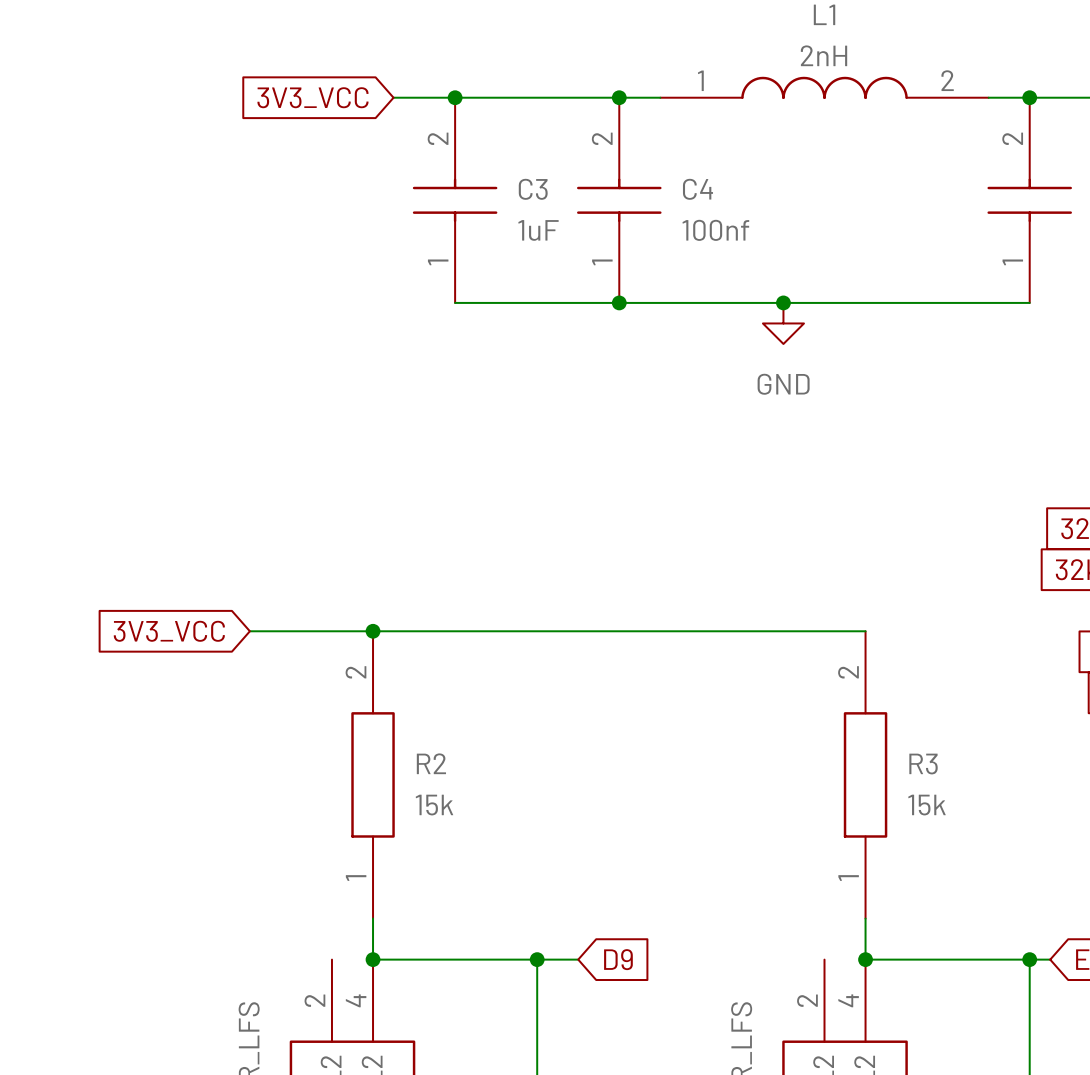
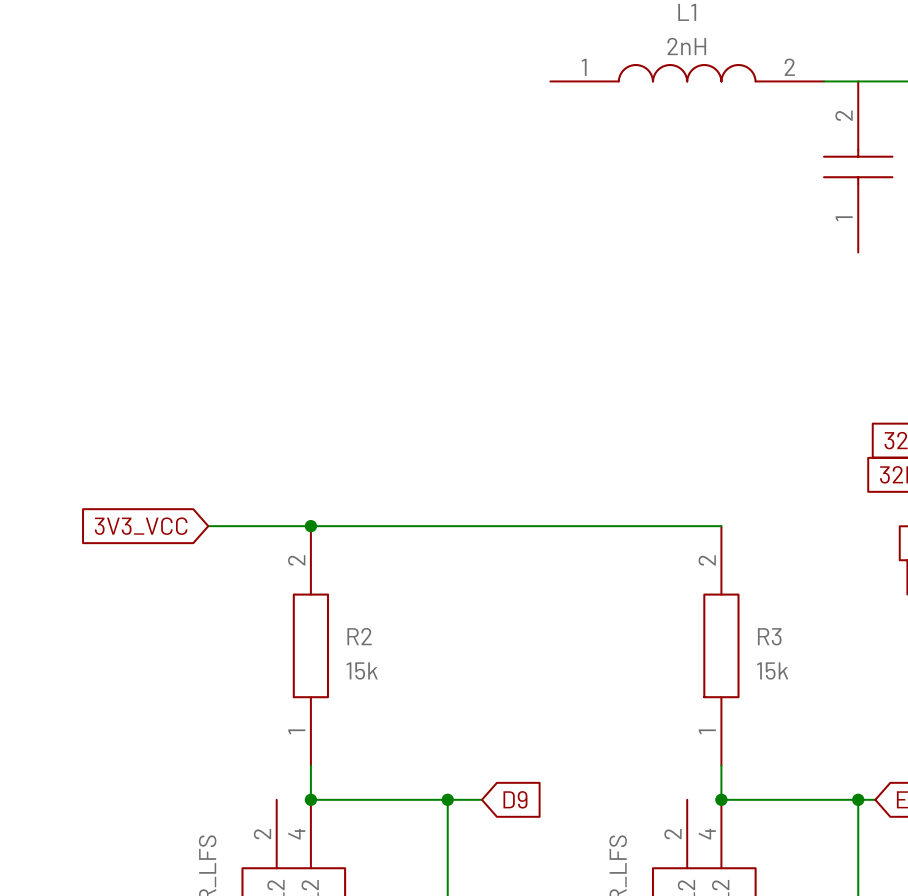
global label: 3V3_VCC (312, 97) -> none
wire: (393, 97) (660, 97) -> none
junction: (455, 97) -> none
junction: (619, 97) -> none
junction: (1029, 97) -> none
C3: 1uF (455, 200) -> none
C4: 100nf (619, 200) -> none
wire: (455, 302) (1029, 302) -> none
junction: (619, 302) -> none
junction: (783, 302) -> none
power symbol: GND (783, 323) -> none

